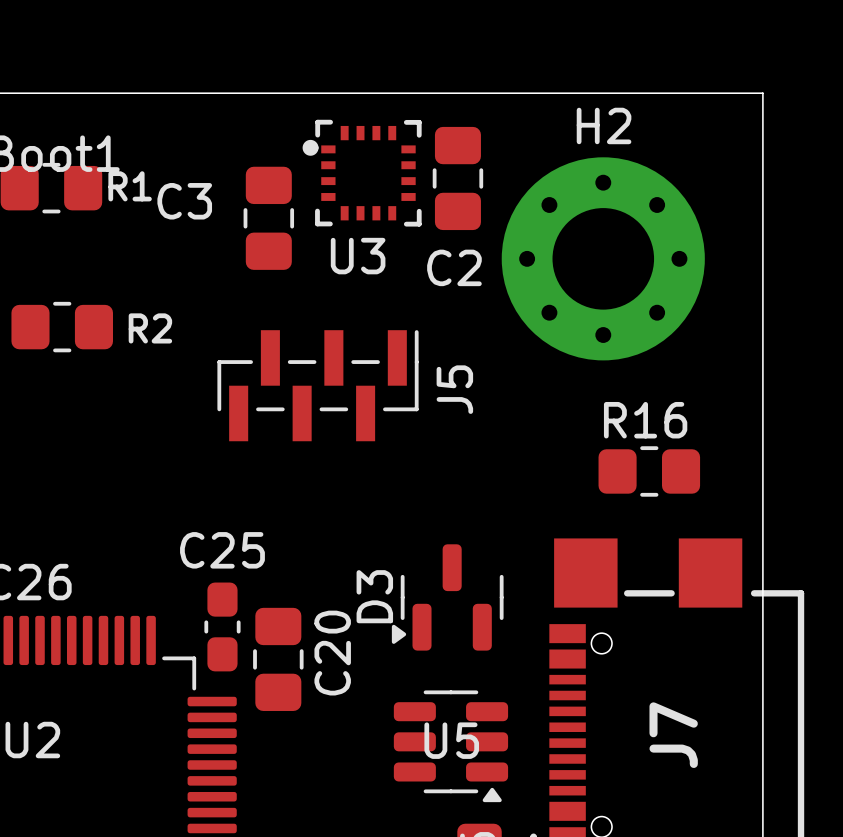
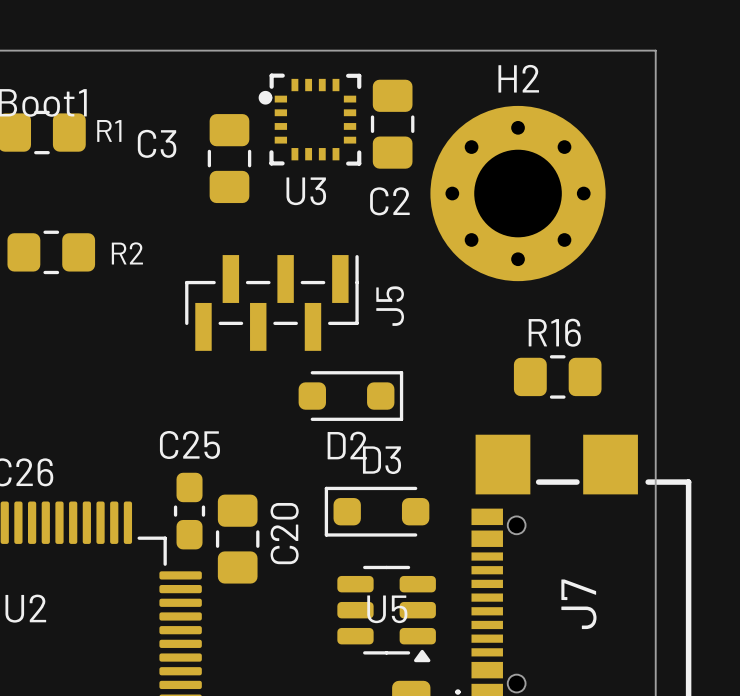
D2: none -> (350, 396)
D3 footprint: [391, 544, 504, 651] -> [324, 486, 430, 537]
D3 name position: D3 (374, 596) -> D3 (381, 460)

